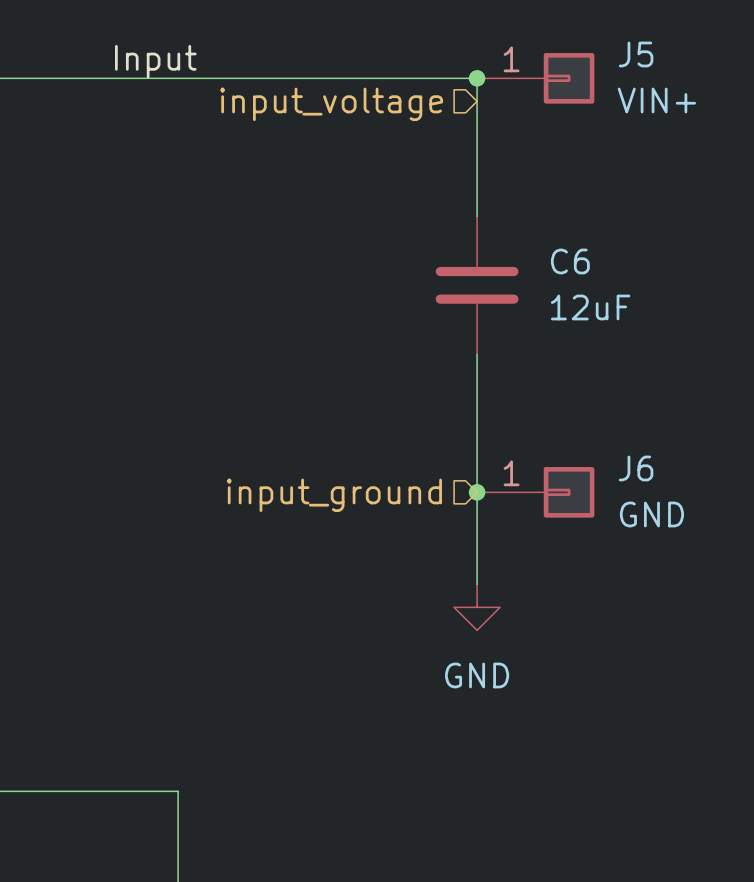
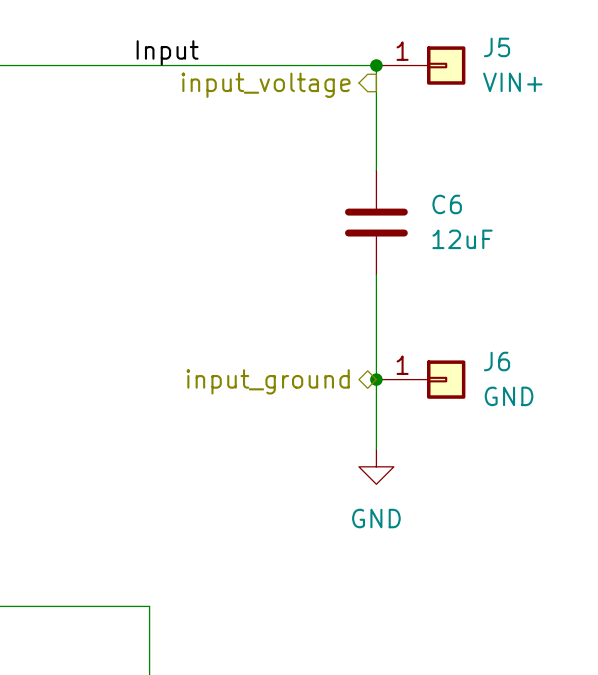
label position: Input (155, 61) -> Input (167, 52)
hierarchical label shape: input (331, 104) -> output (266, 85)
hierarchical label shape: input (334, 495) -> bidirectional (268, 381)

